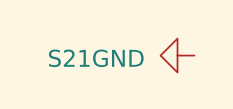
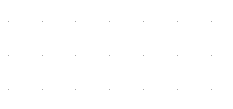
power symbol: S21GND (177, 55) -> none

